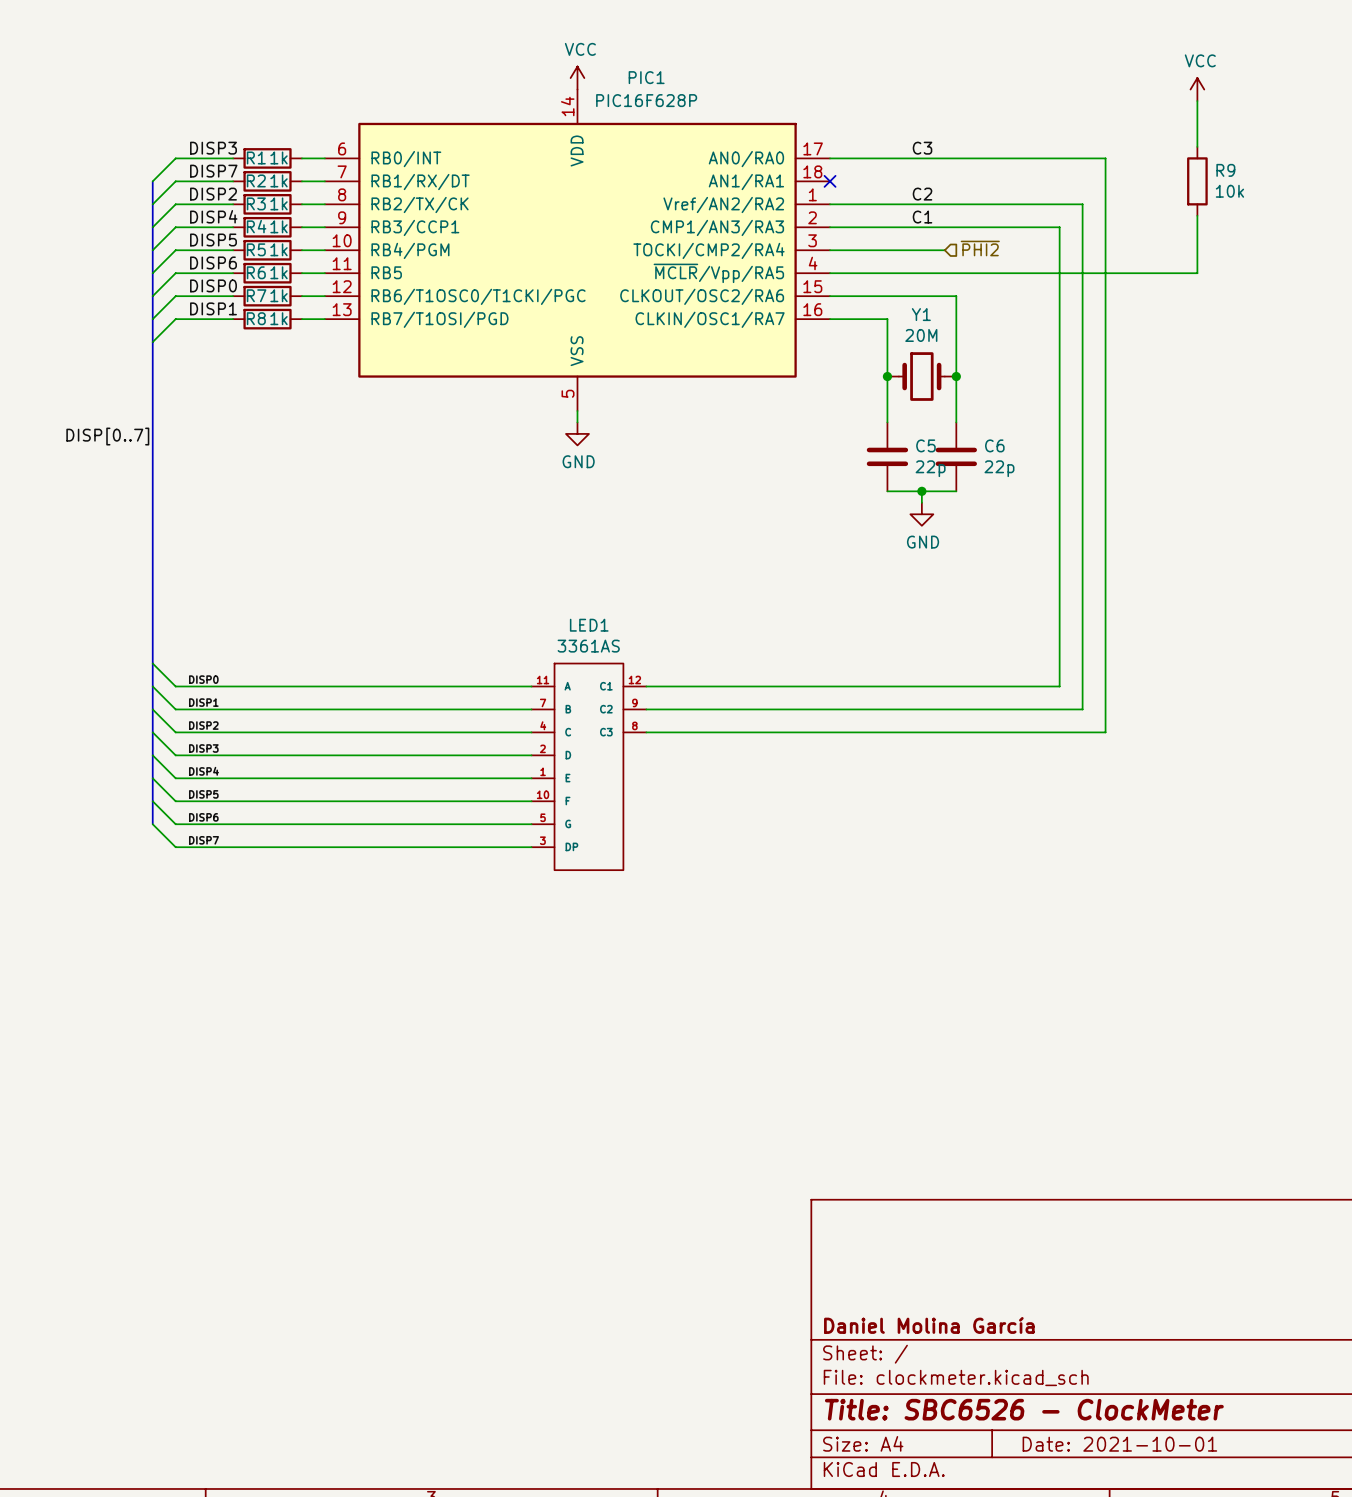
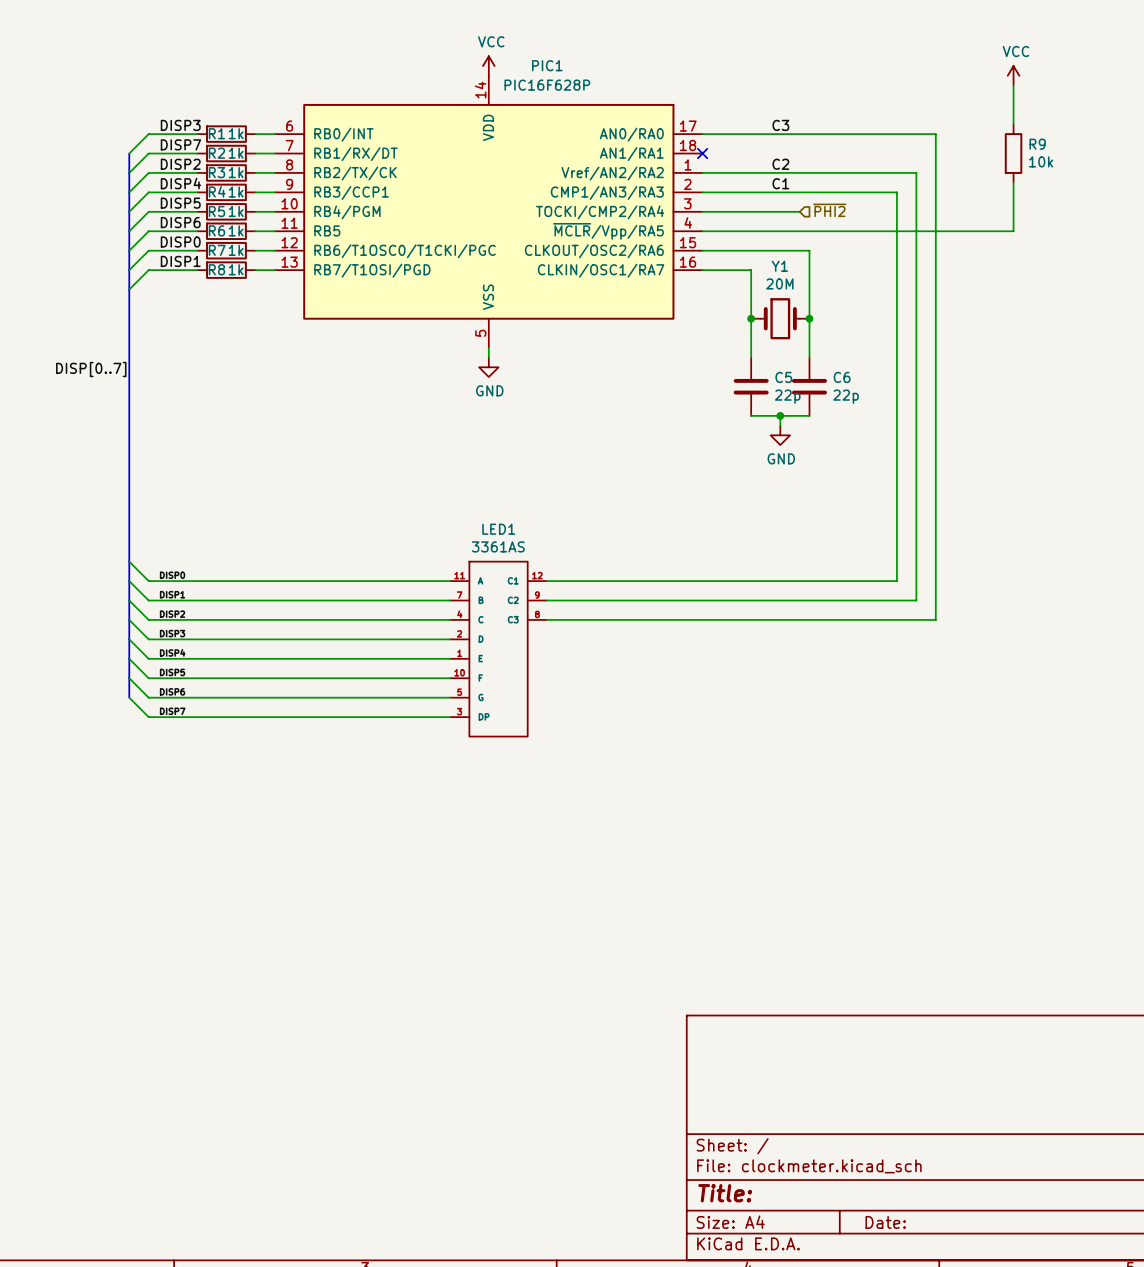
title block: Daniel Molina García (929, 1325) -> none
title block: Title: SBC6526 - ClockMeter (1024, 1409) -> Title: (725, 1193)
title block: Date: 2021-10-01 (1119, 1444) -> Date: (885, 1222)

